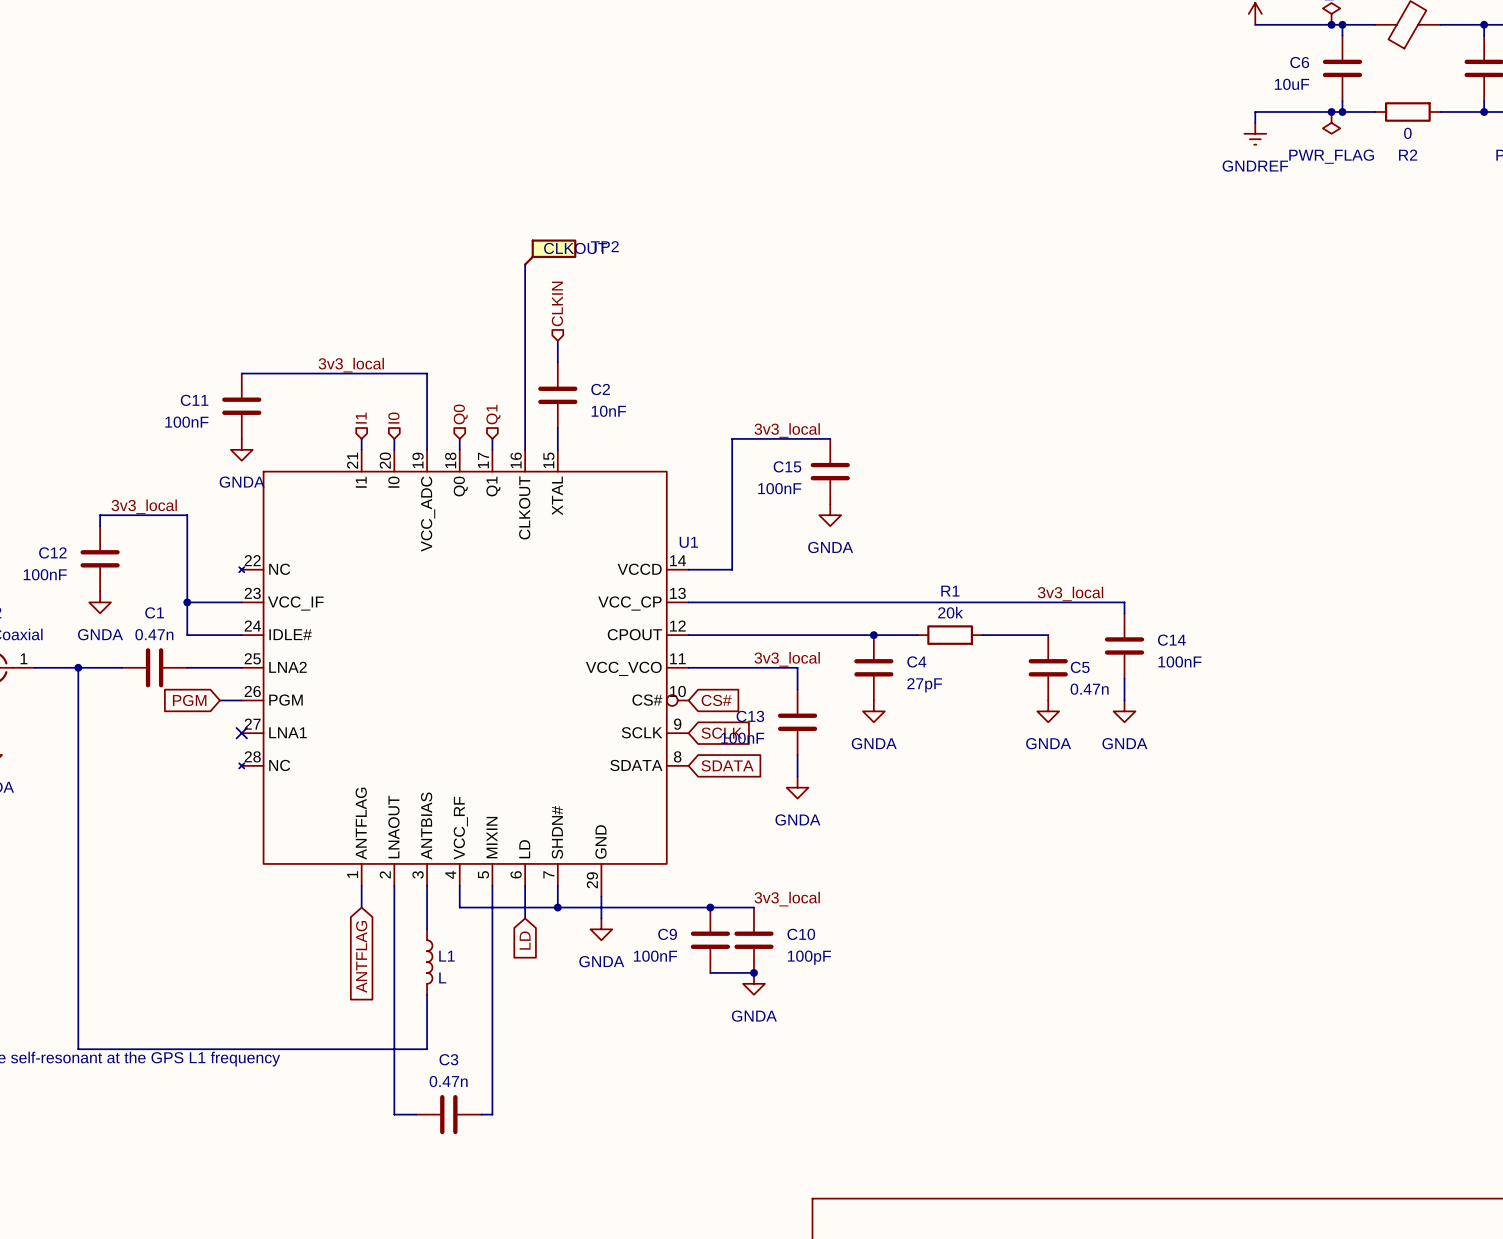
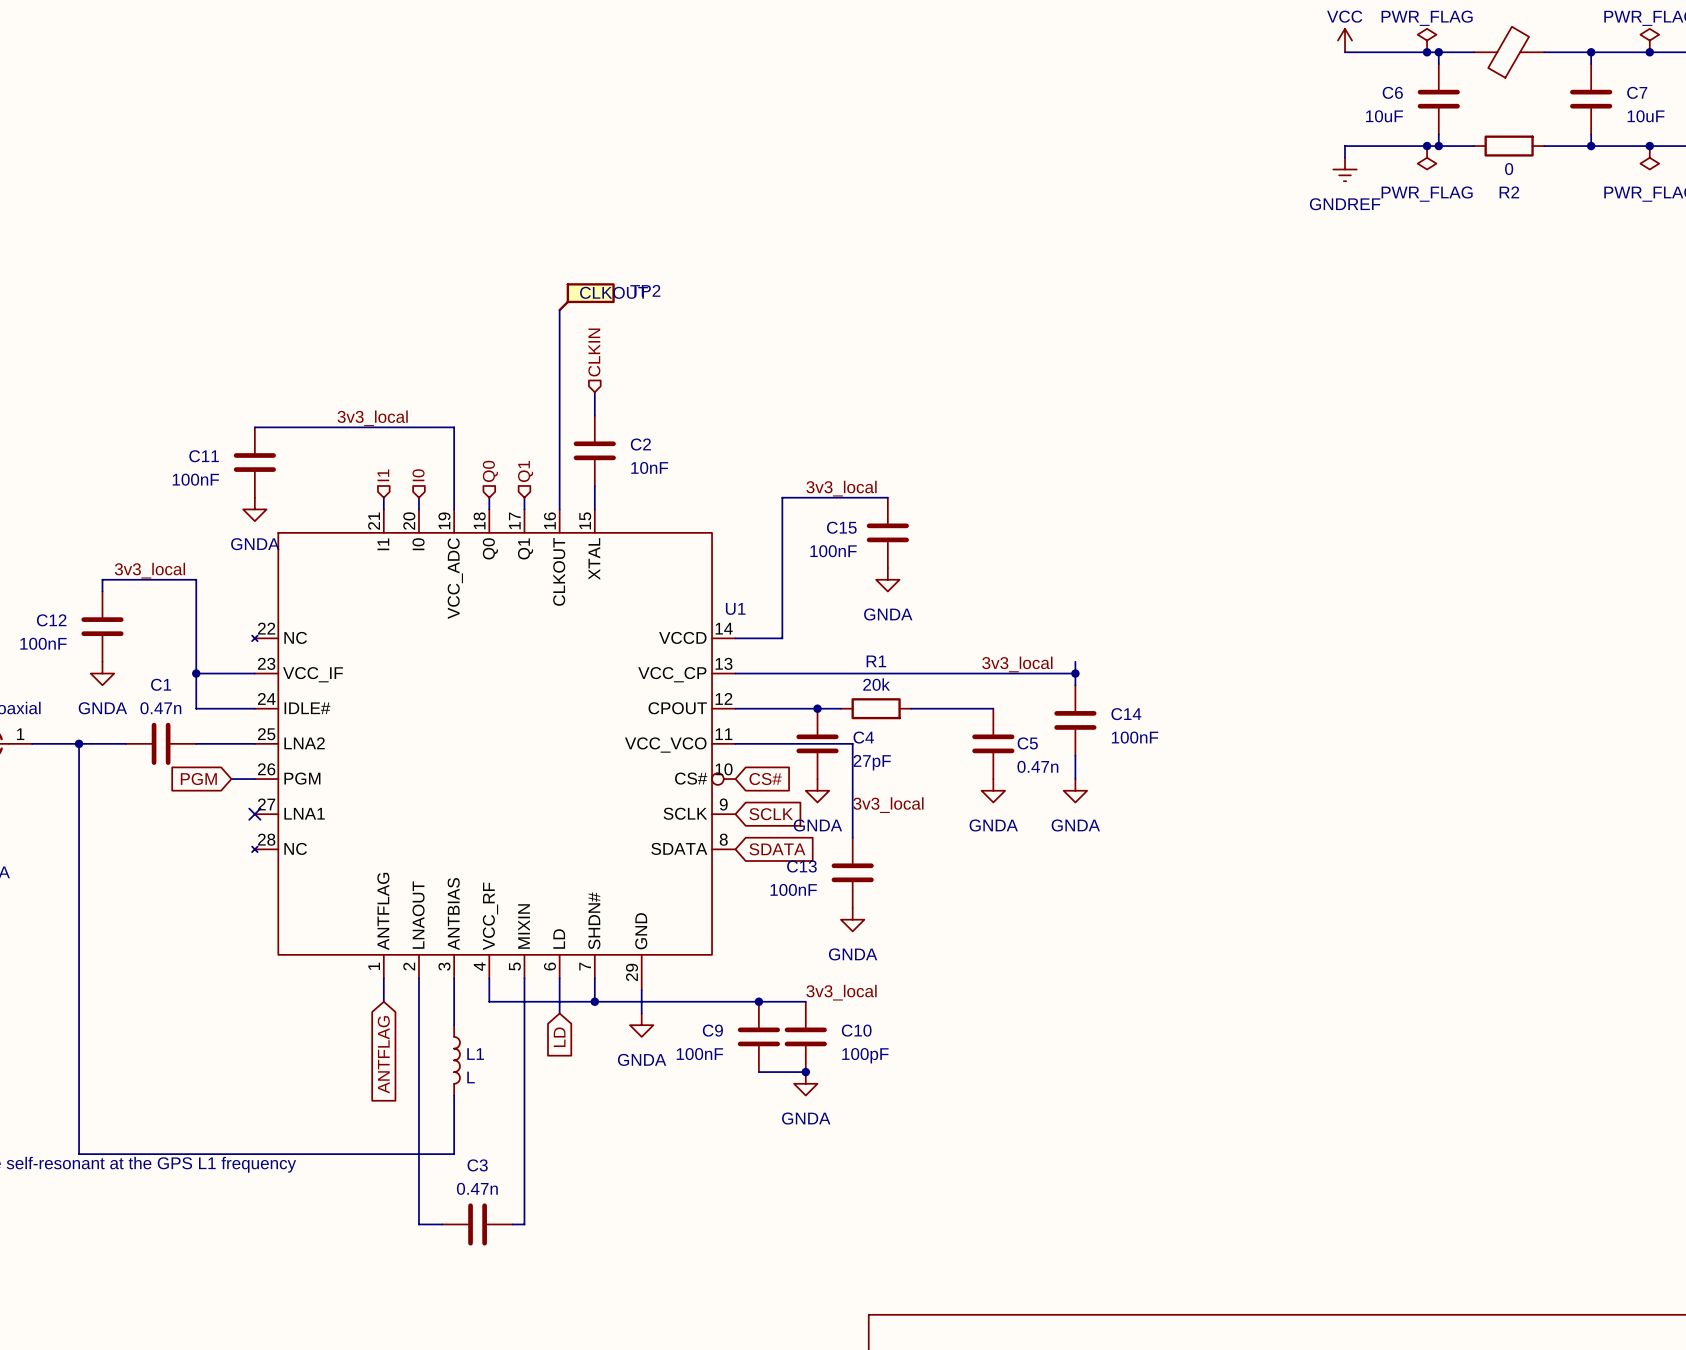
wire: none -> (1075, 661) (1075, 685)
label: none -> 3v3_local (1017, 664)
label: 3v3_local (1070, 593) -> none
wire: (1004, 602) (1124, 602) (1124, 613) -> none
junction: none -> (1075, 673)
junction: none -> (817, 708)
wire: (786, 635) (852, 635) -> none
junction: (873, 635) -> none
R1 position: (950, 635) -> (876, 708)
wire: (982, 635) (1048, 635) -> none
C14 position: (1124, 646) -> (1075, 720)
label position: 3v3_local (787, 659) -> 3v3_local (888, 805)
C4 position: (873, 667) -> (817, 743)
C5 position: (1048, 667) -> (993, 743)
wire: (1124, 678) (1124, 700) -> (1075, 755) (1075, 779)
power symbol: none -> GNDA (817, 790)
power symbol: GNDA (873, 711) -> none
power symbol: none -> GNDA (993, 790)
power symbol position: GNDA (1048, 711) -> GNDA (1075, 790)
power symbol: GNDA (1124, 711) -> none
C13 position: (797, 722) -> (852, 872)
power symbol: GNDA (797, 787) -> none
power symbol: none -> GNDA (852, 919)

